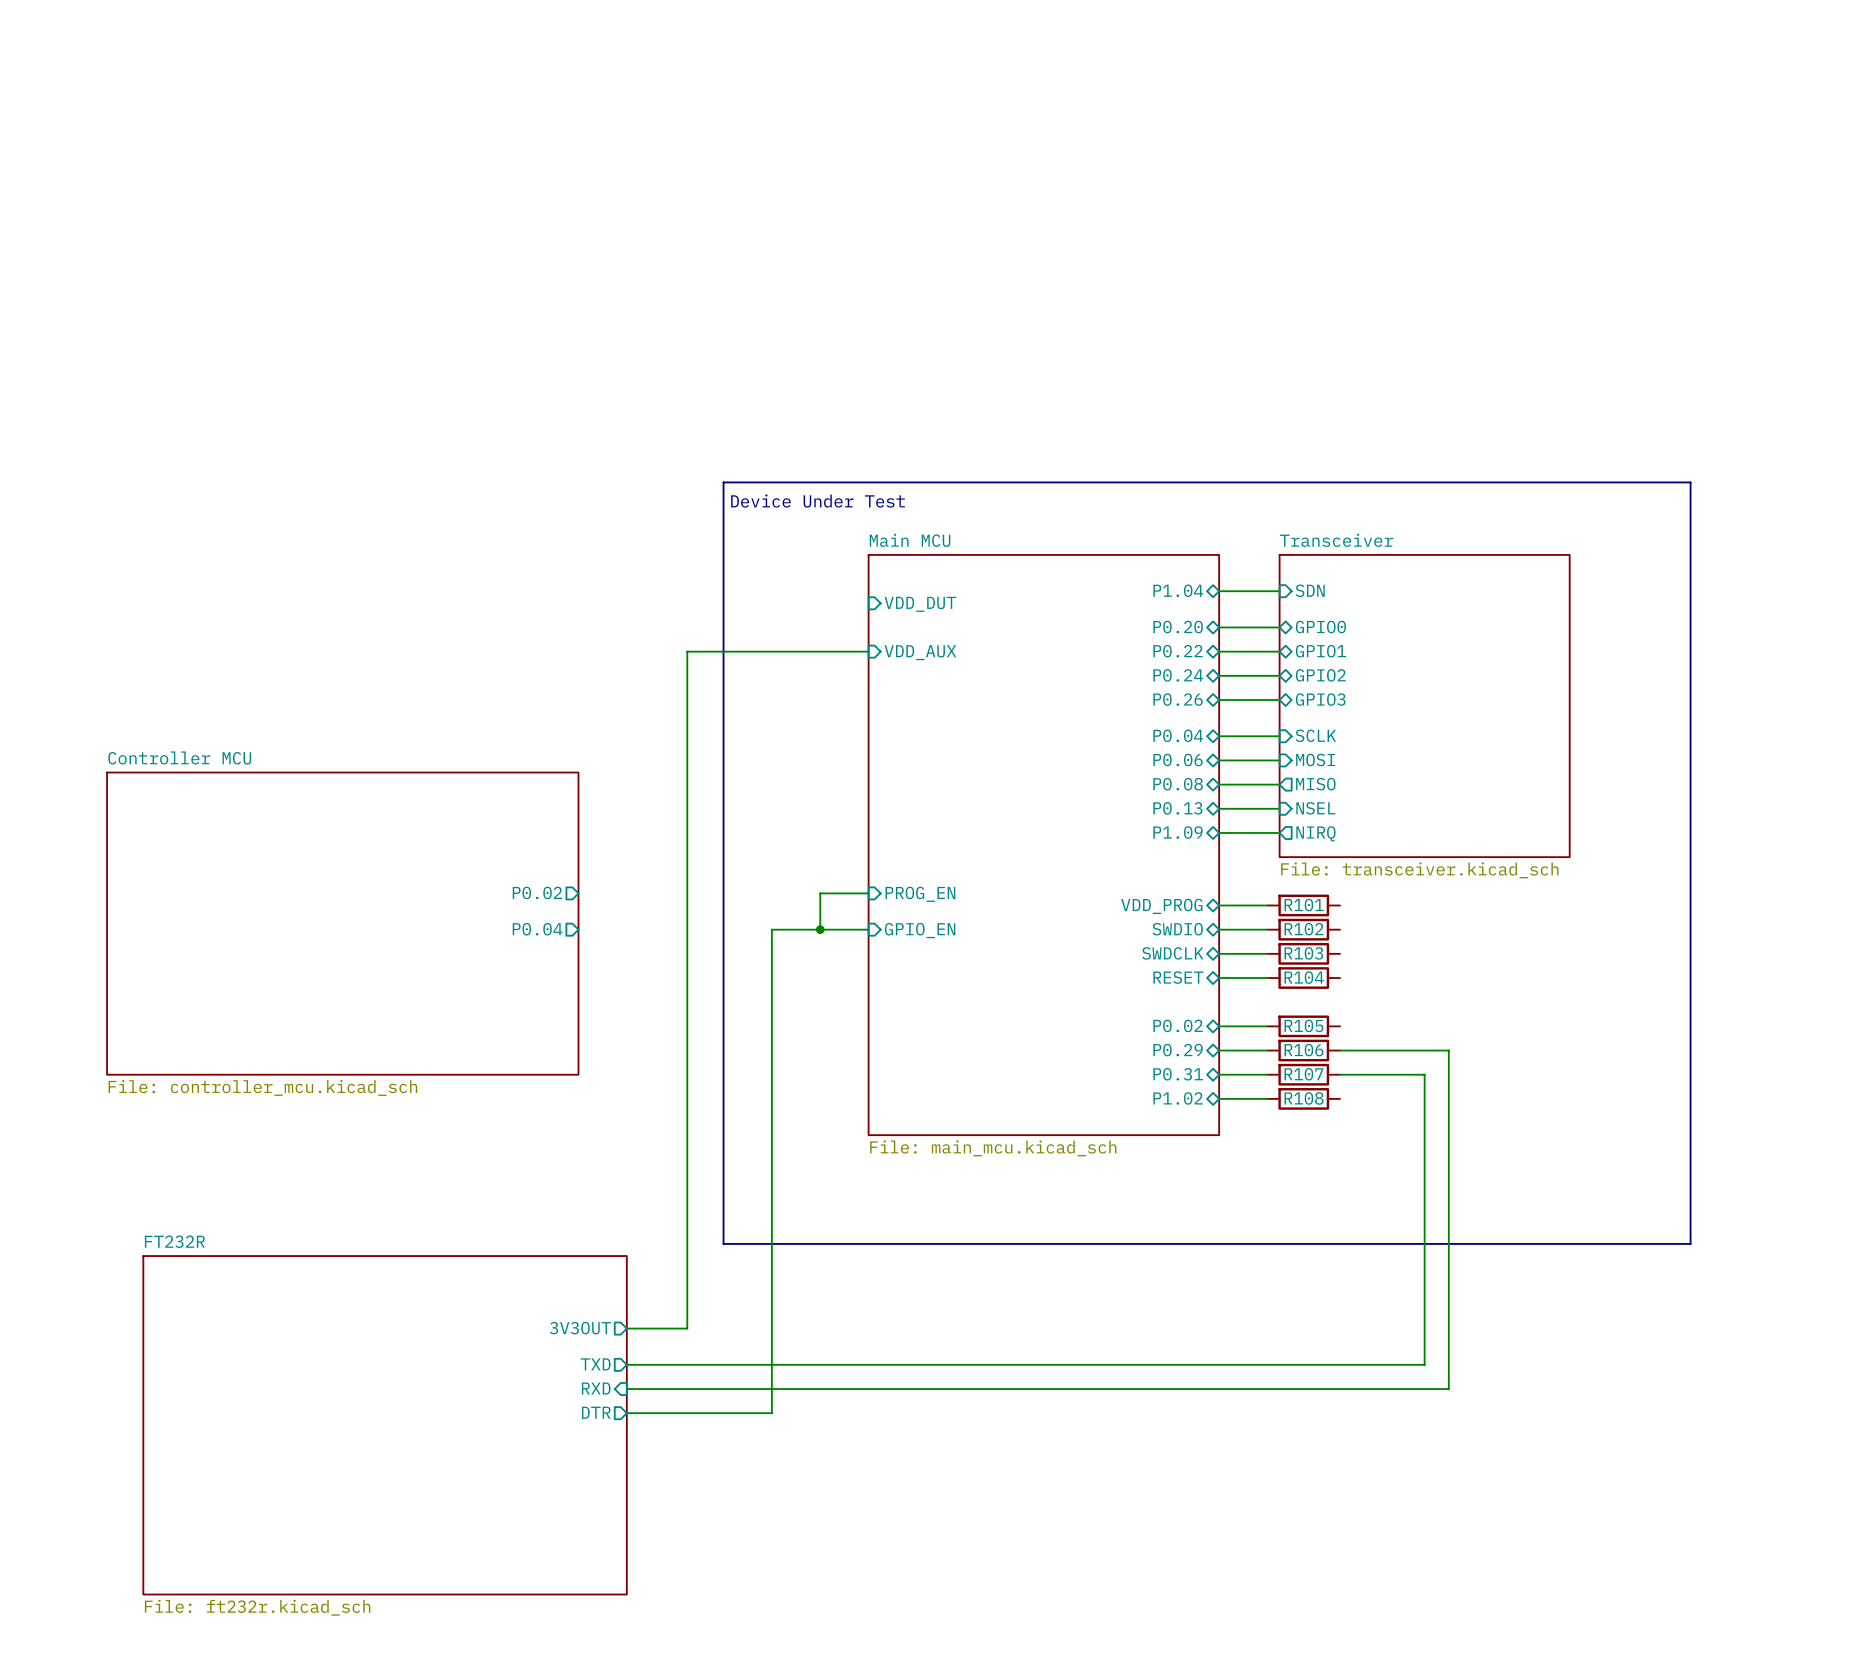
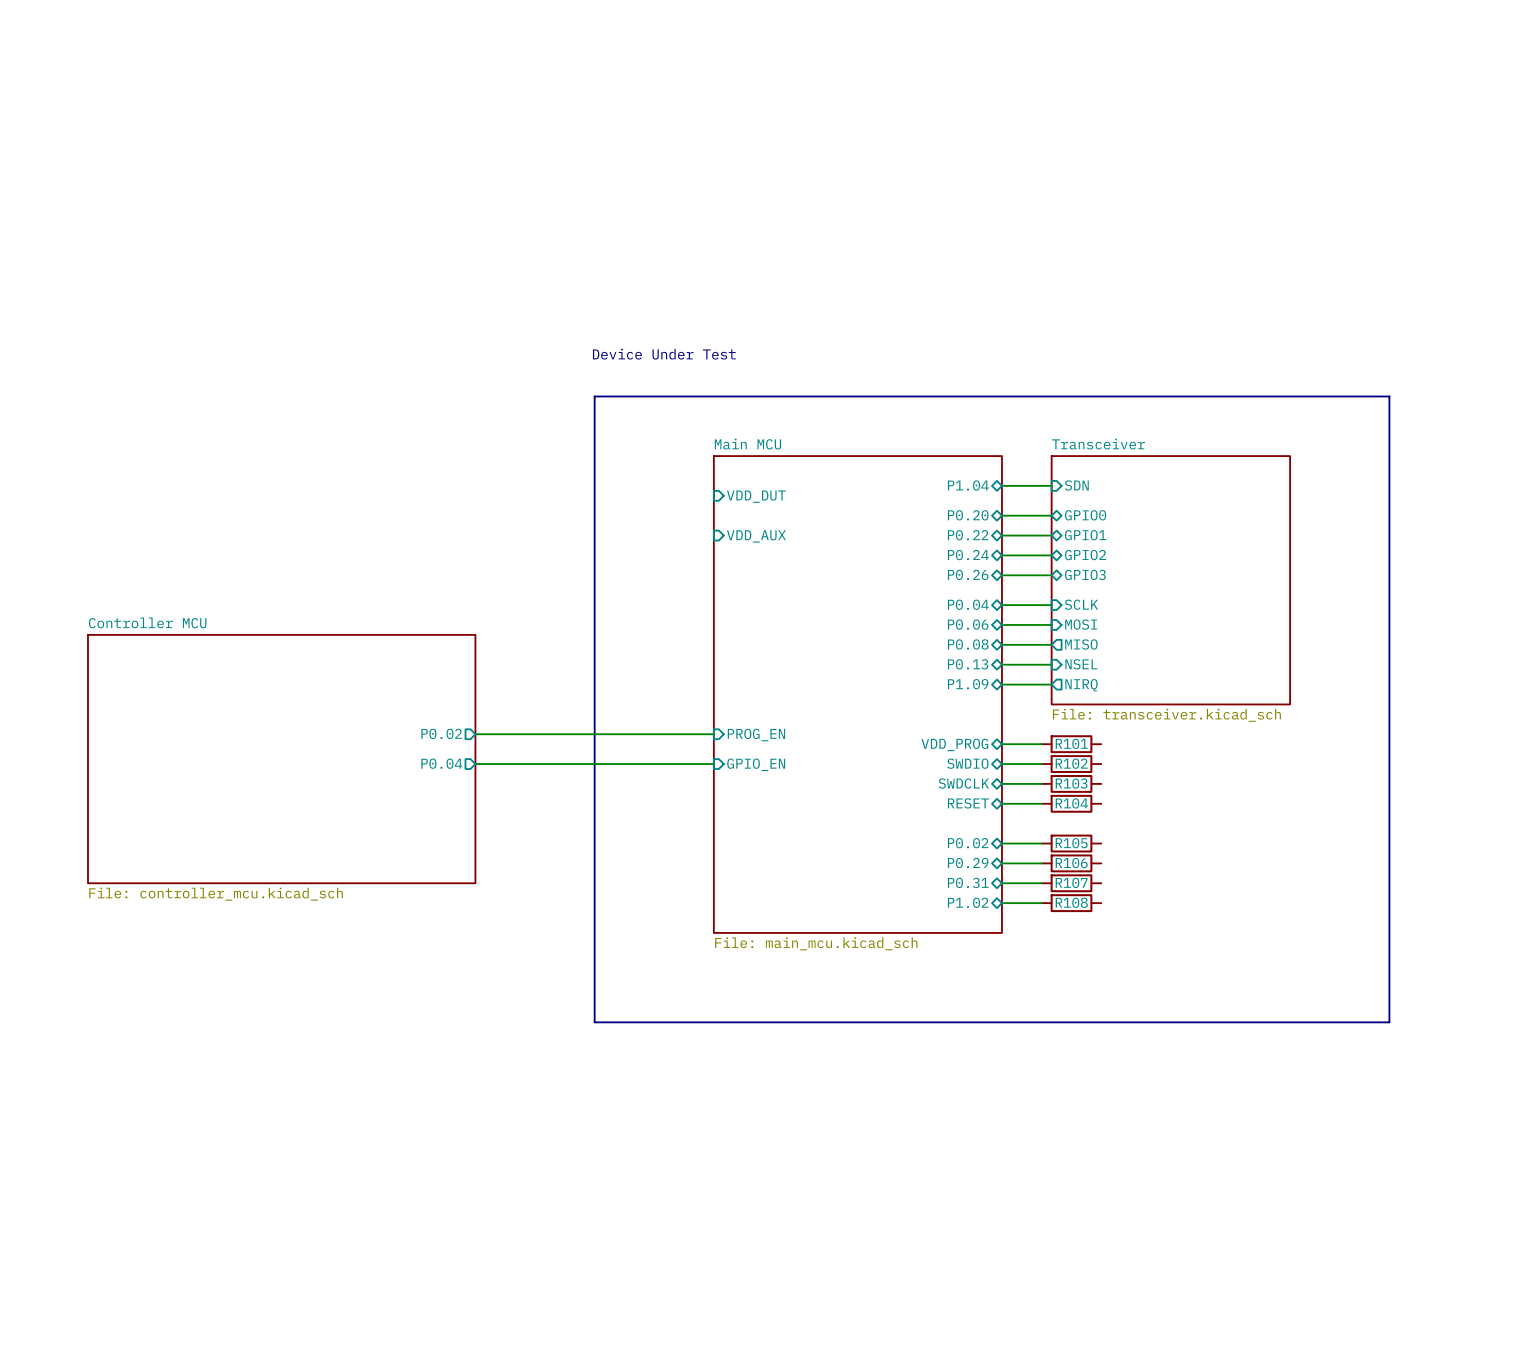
text position: Device Under Test (818, 501) -> Device Under Test (664, 354)
wire: (868, 651) (687, 651) (687, 1328) (626, 1328) -> none
wire: (820, 893) (820, 929) -> (674, 734) (475, 734)
wire: (771, 929) (771, 1413) (626, 1413) -> (634, 764) (475, 764)
junction: (820, 929) -> none
wire: (1340, 1050) (1448, 1050) (1448, 1389) (626, 1389) -> none
wire: (1340, 1074) (1424, 1074) (1424, 1364) (626, 1364) -> none
sheet pin: 3V3OUT (580, 1328) -> none
sheet pin: TXD (595, 1364) -> none
sheet pin: RXD (596, 1388) -> none
sheet pin: DTR (596, 1412) -> none
sheet FT232R: File: ft232r.kicad_sch (385, 1425) -> none

